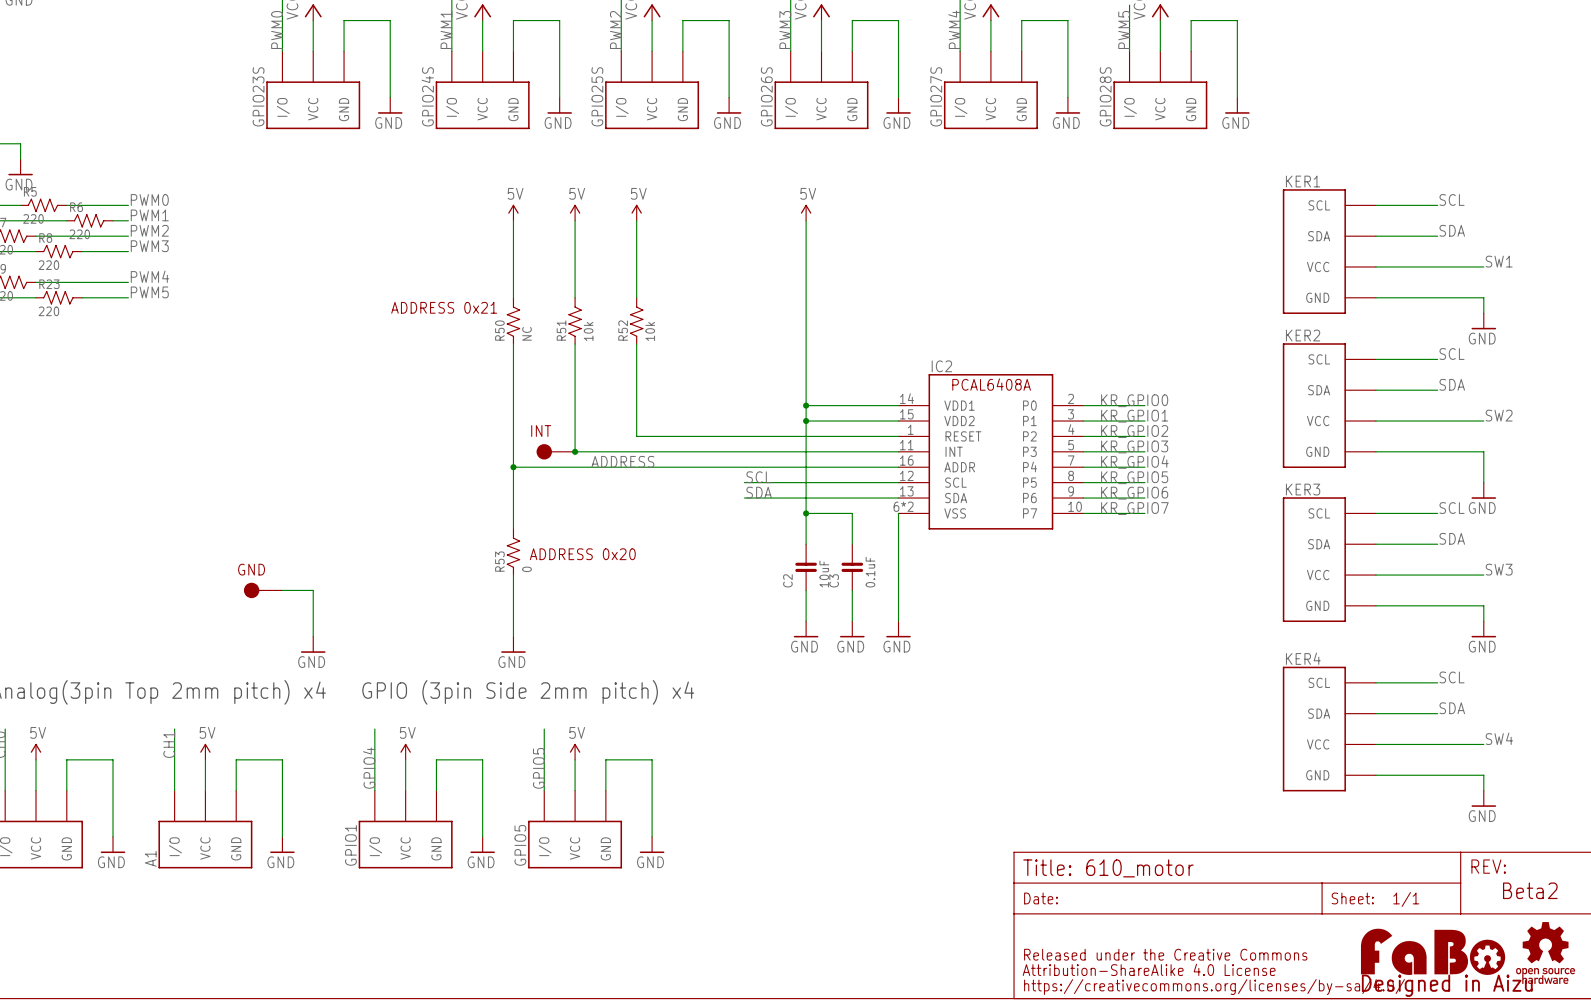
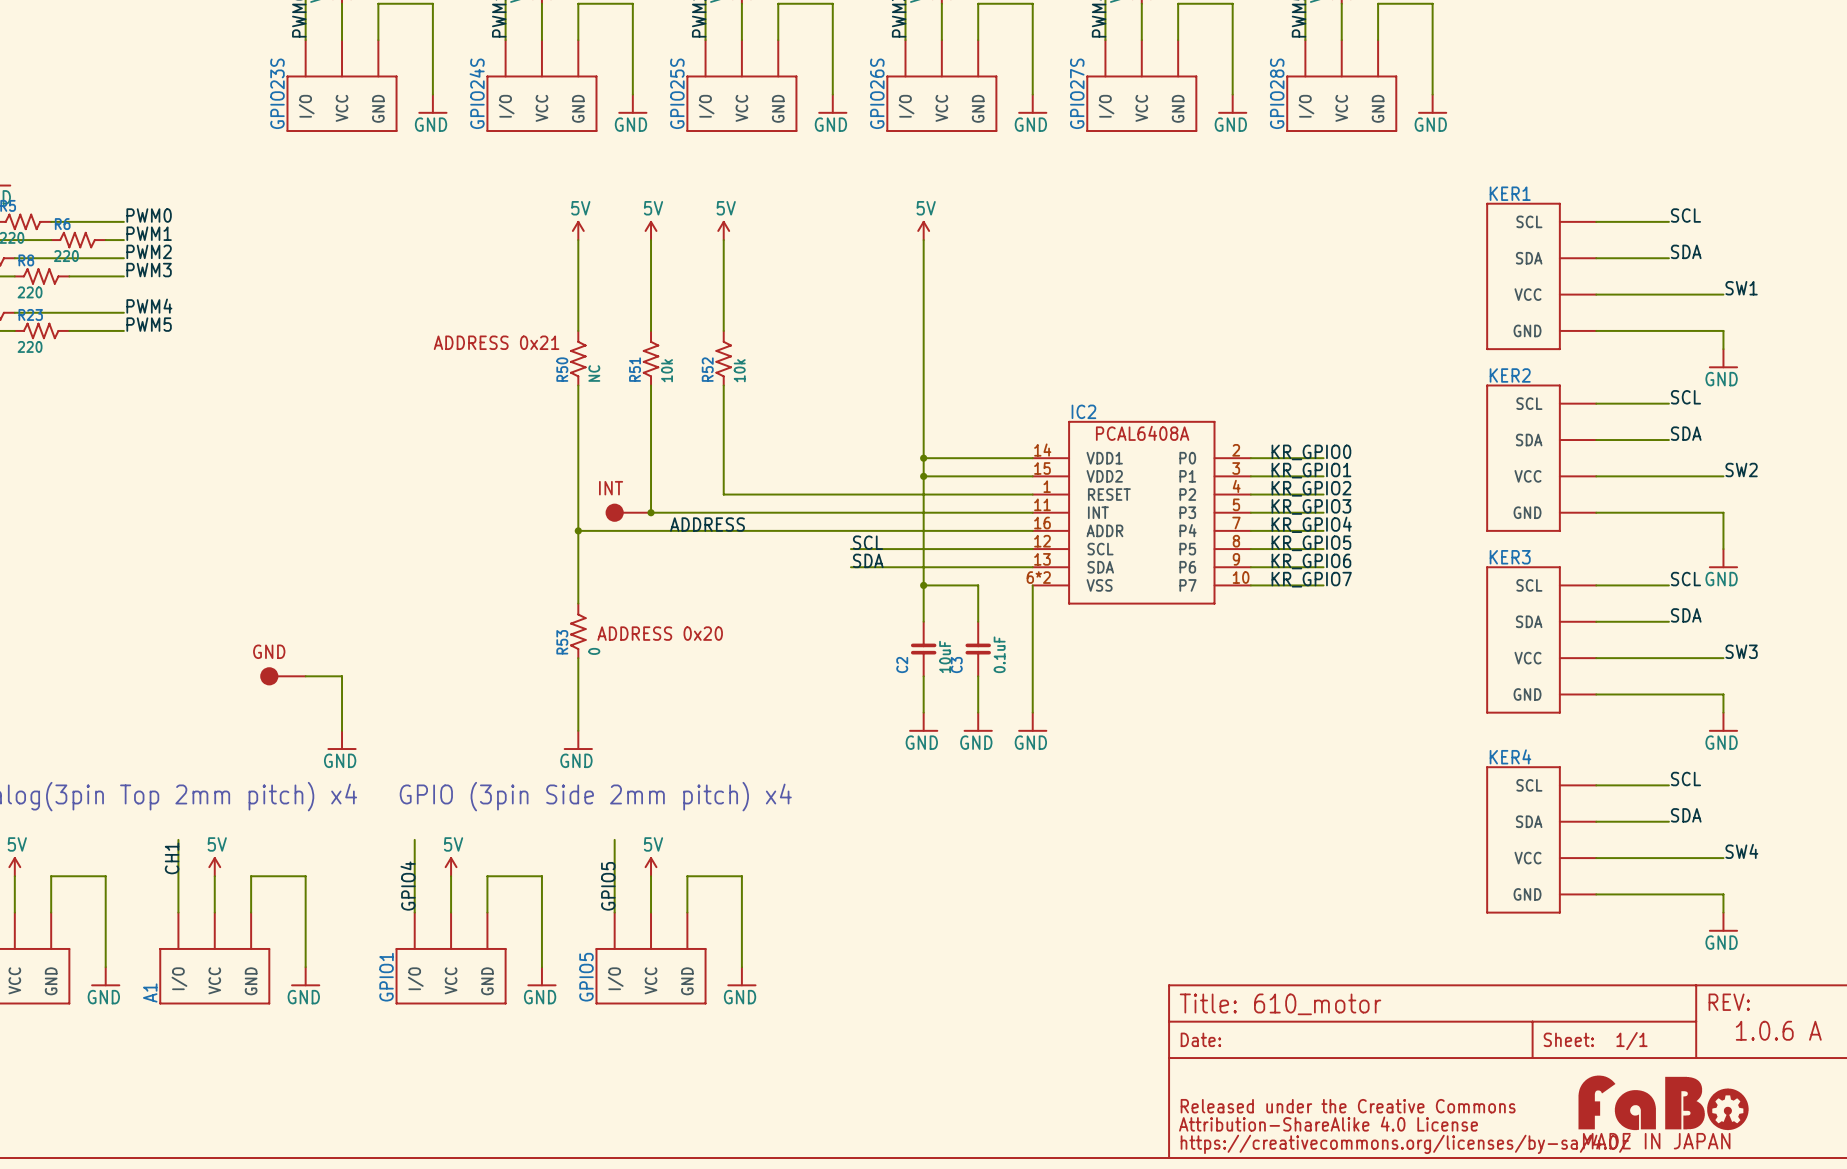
text: Beta2 (1530, 890) -> 1.0.6 A (1778, 1030)
part: (1545, 953) -> none
part text: none -> MADE IN JAPAN (1656, 1141)
part text: Designed in Aizu (1447, 985) -> none

